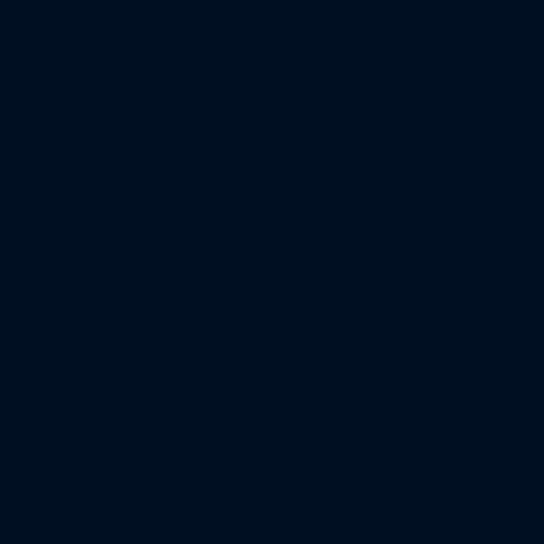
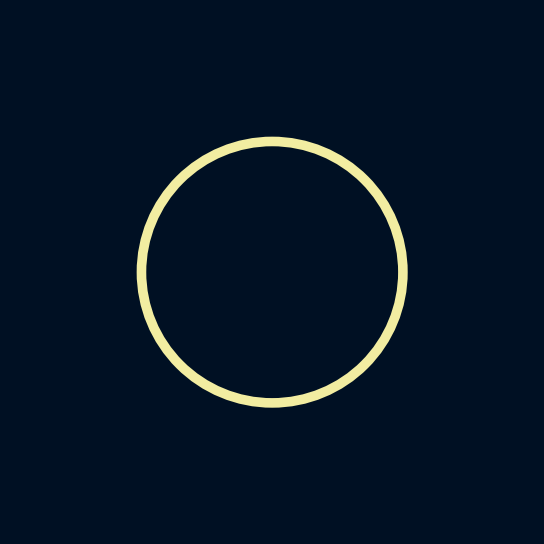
drawing: none -> [136, 136, 408, 408]

